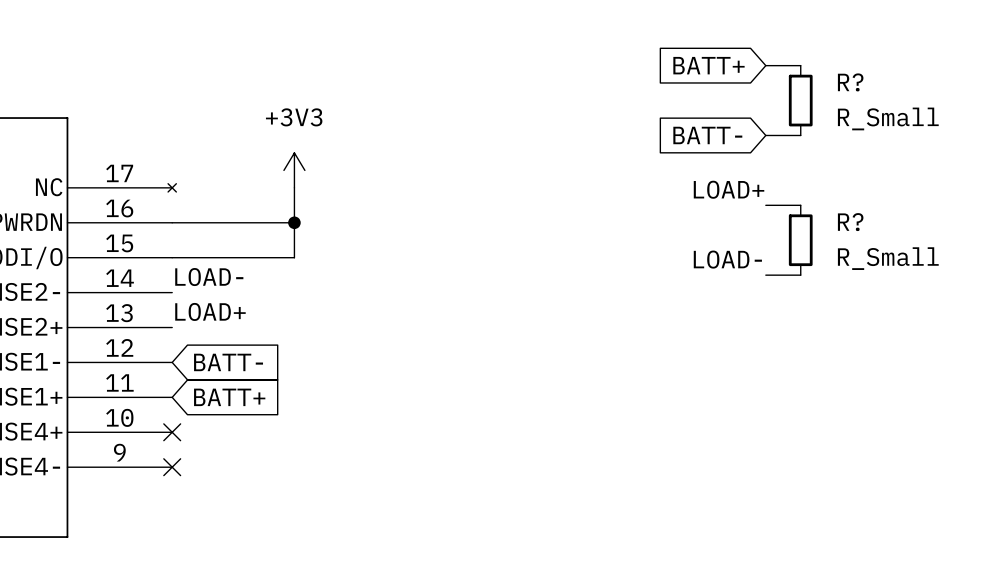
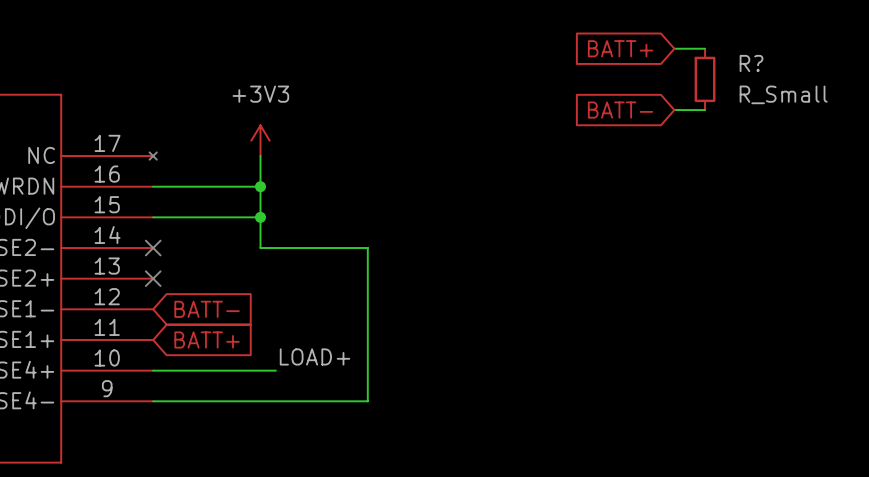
label: LOAD+ (729, 189) -> none
wire: (765, 205) (800, 205) -> none
R?: R_Small (800, 240) -> none
wire: none -> (260, 217) (260, 248) (367, 248) (367, 401) (153, 401)
junction: none -> (260, 217)
label: LOAD- (727, 259) -> none
wire: (765, 275) (800, 275) -> none
label: LOAD- (209, 277) -> none
no-connect mark: none -> (153, 248)
label position: LOAD+ (210, 311) -> LOAD+ (315, 356)
no-connect mark: none -> (153, 278)
wire: none -> (153, 370) (275, 370)
no-connect mark: (172, 432) -> none
no-connect mark: (172, 467) -> none

